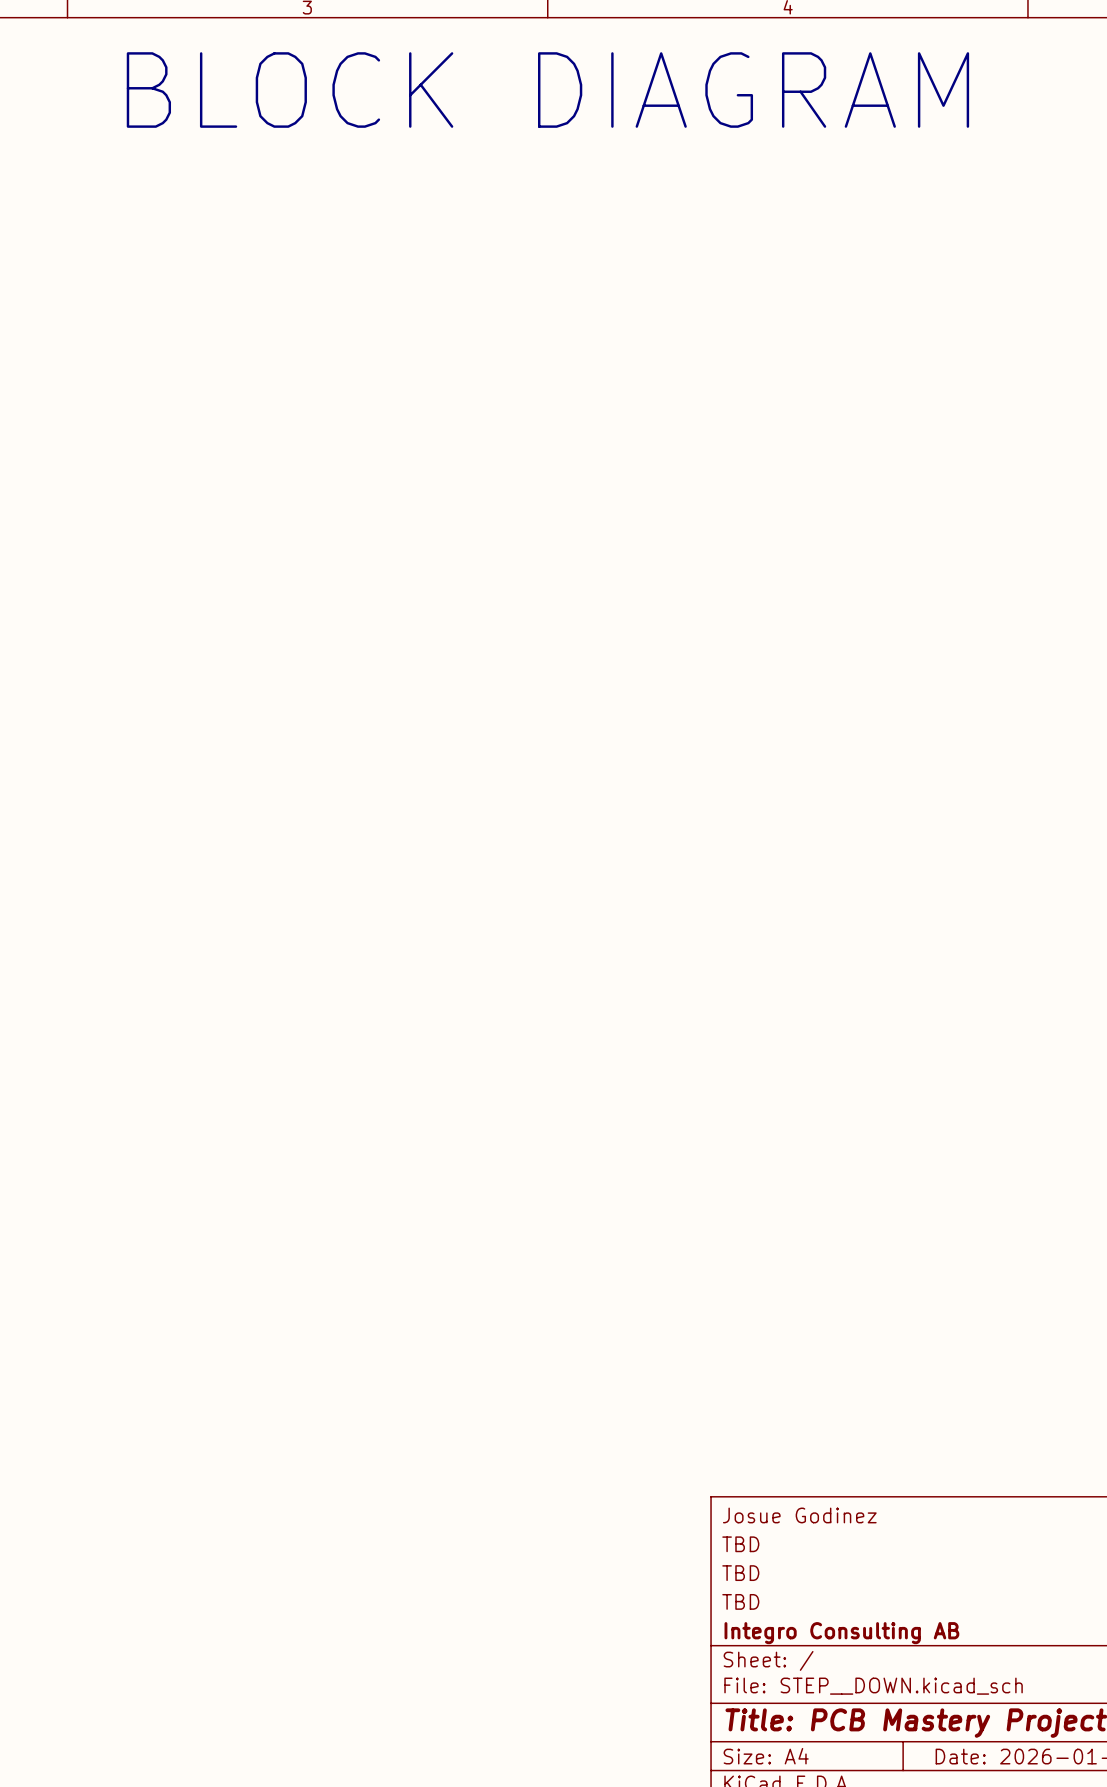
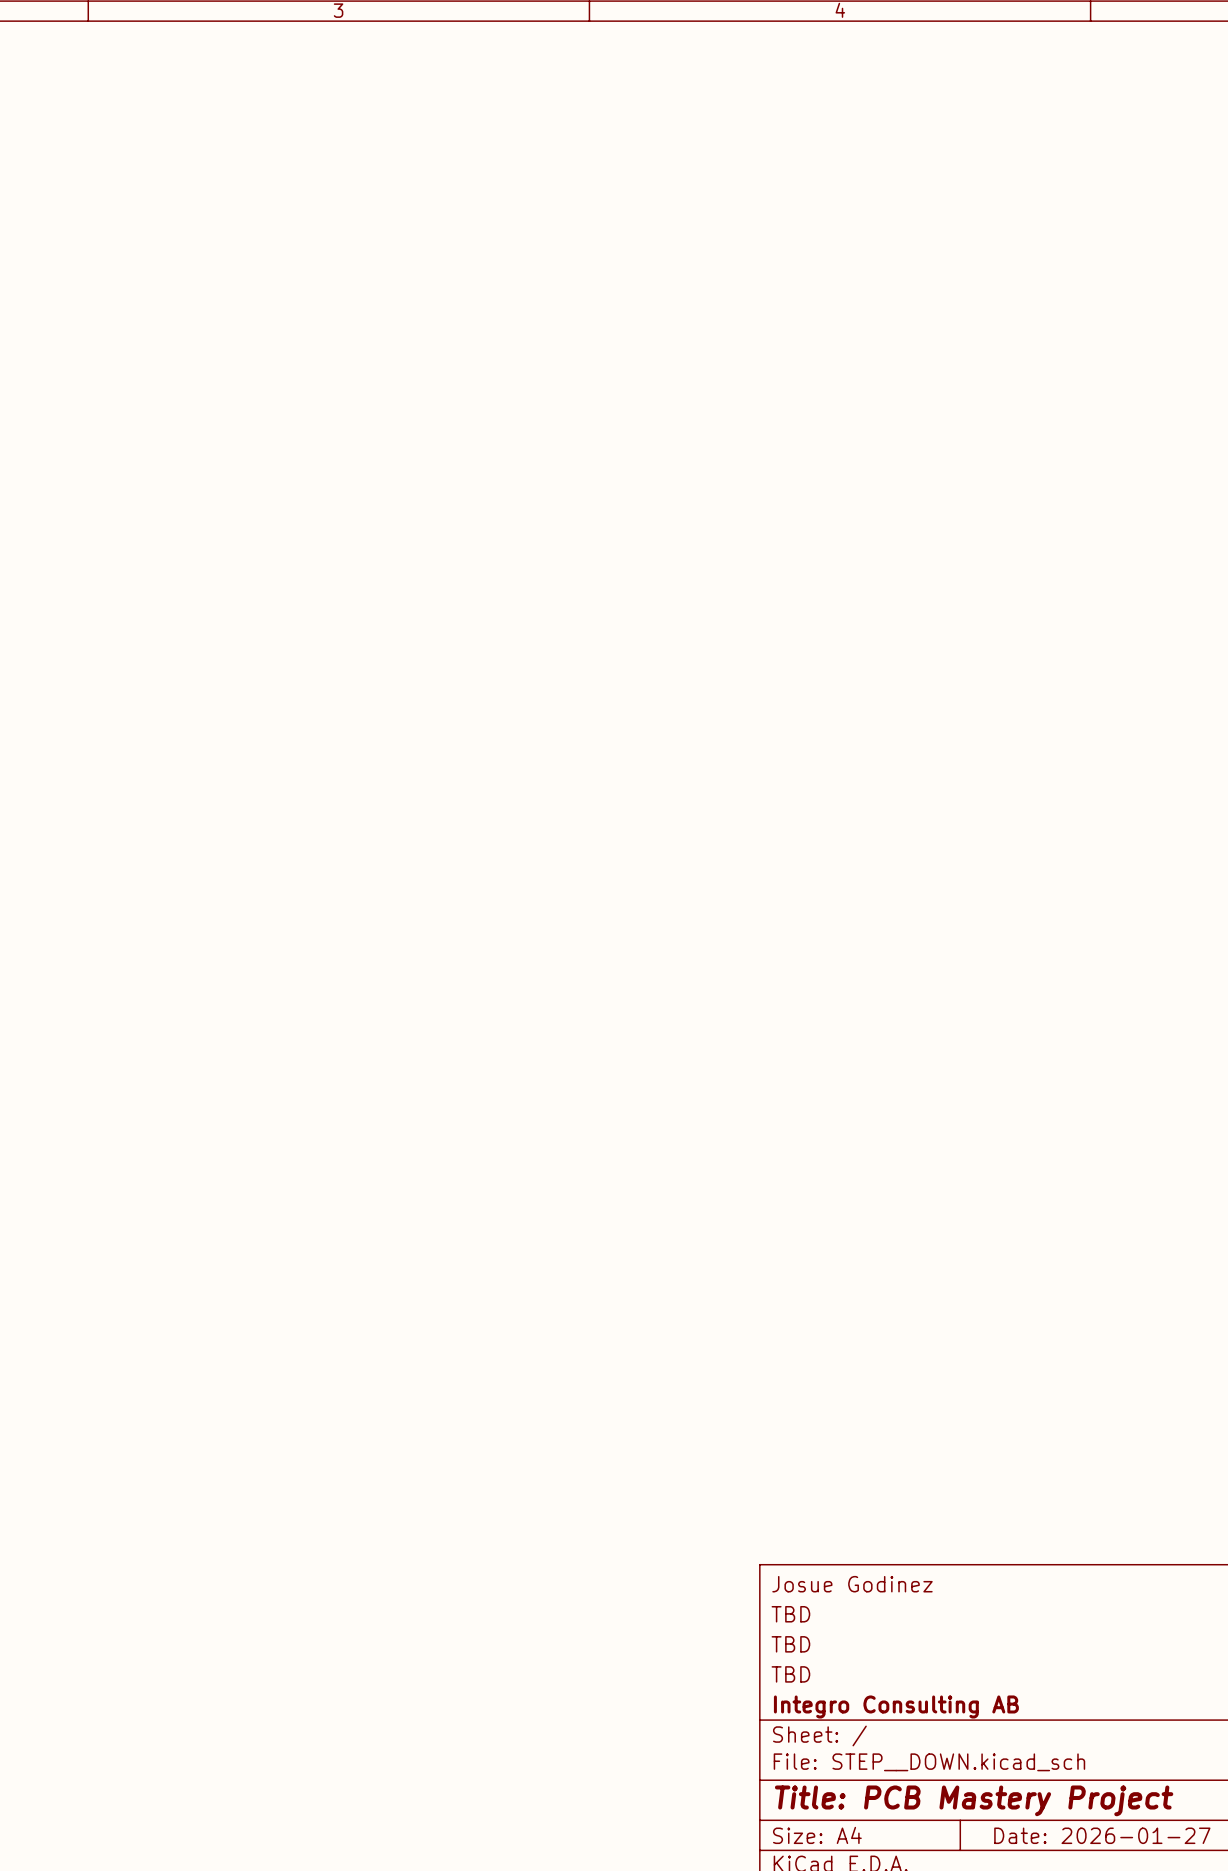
text: BLOCK DIAGRAM (547, 90) -> none

